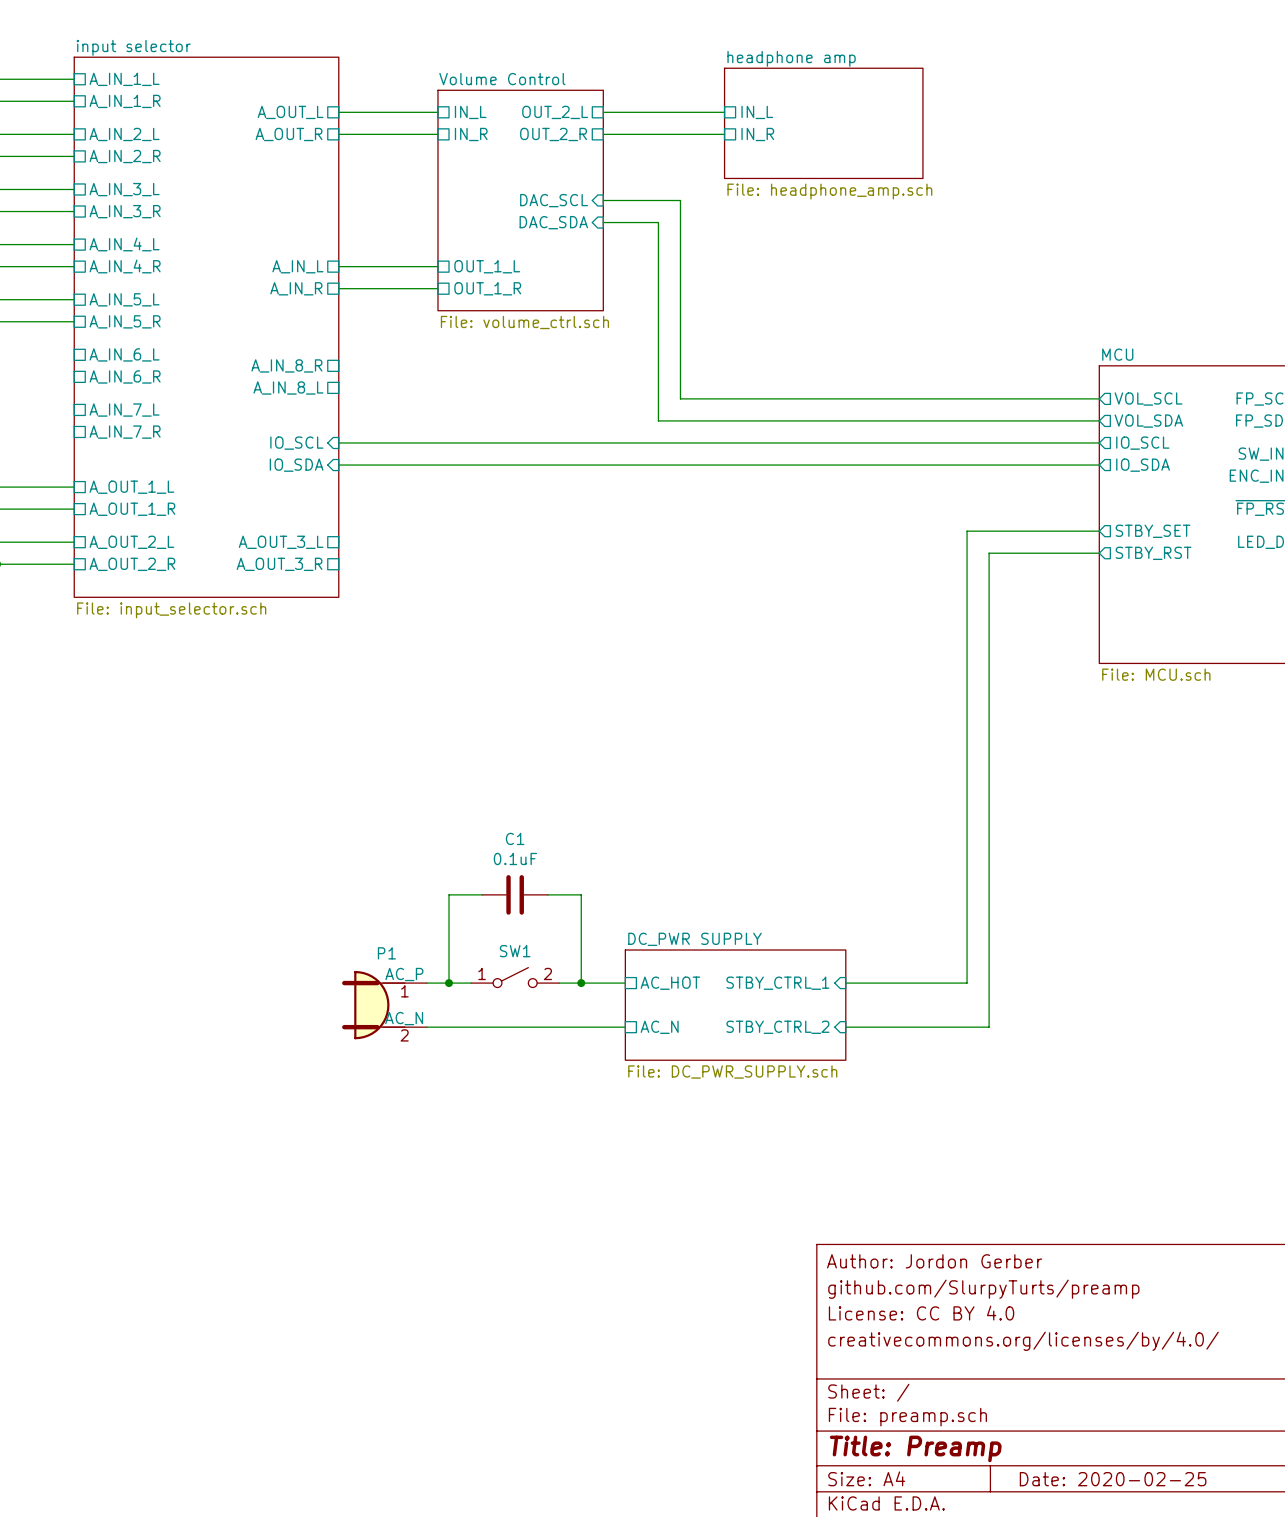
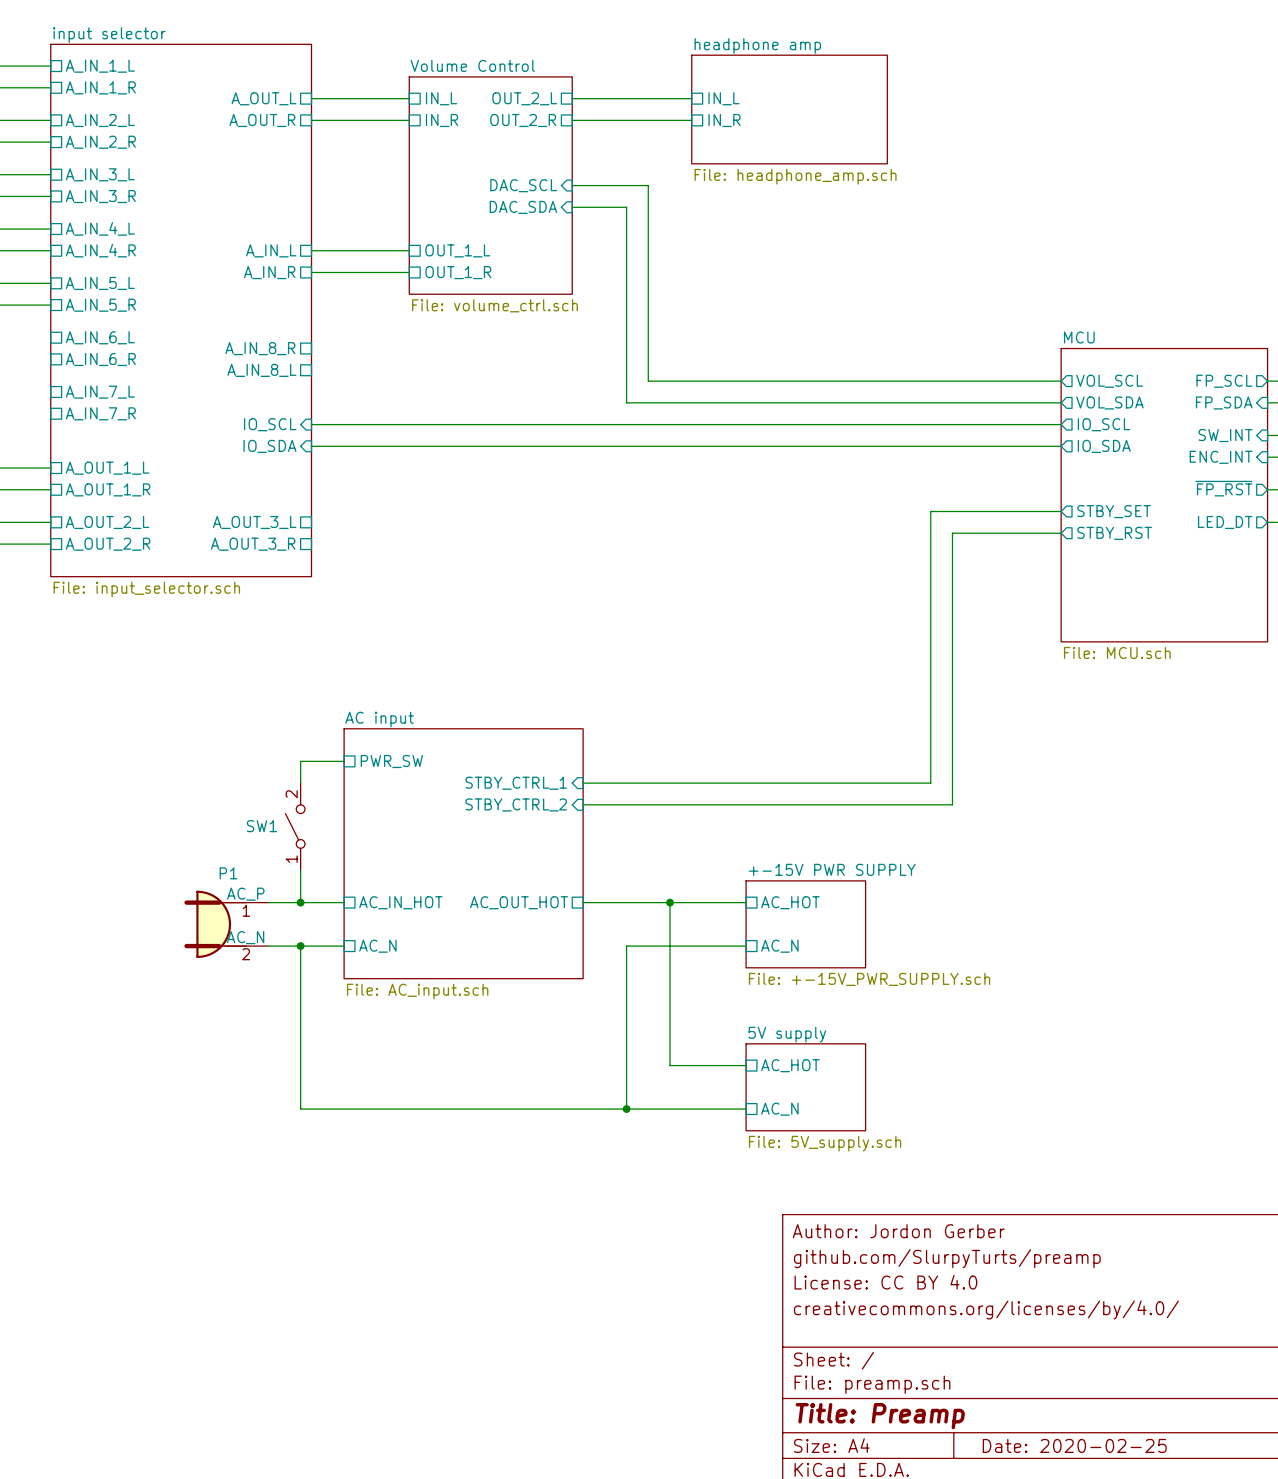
wire: none -> (344, 761) (300, 761) (300, 783)
sheet pin: none -> PWR_SW (391, 761)
sheet pin: none -> STBY_CTRL_1 (516, 783)
wire: (967, 806) (967, 983) (845, 983) -> (930, 783) (583, 783)
sheet pin: none -> STBY_CTRL_2 (516, 804)
wire: (989, 828) (989, 1027) (845, 1027) -> (952, 804) (583, 804)
sheet AC input: none -> File: AC_input.sch (463, 853)
wire: none -> (300, 870) (300, 902)
wire: (482, 894) (449, 894) (449, 983) -> none
C1: 0.1uF (515, 894) -> none
wire: (548, 894) (581, 894) (581, 983) -> none
wire: none -> (268, 902) (344, 902)
junction: none -> (300, 902)
wire: none -> (583, 902) (746, 902)
wire: none -> (670, 902) (670, 1065) (746, 1065)
junction: none -> (670, 902)
sheet pin: none -> AC_IN_HOT (400, 902)
sheet pin: none -> AC_OUT_HOT (519, 902)
sheet pin: none -> AC_HOT (790, 902)
sheet +-15V PWR SUPPLY: none -> File: +-15V_PWR_SUPPLY.sch (805, 924)
wire: none -> (268, 946) (344, 946)
wire: none -> (300, 946) (300, 1109) (746, 1109)
junction: none -> (300, 946)
sheet pin: none -> AC_N (377, 946)
wire: none -> (746, 946) (626, 946) (626, 1109)
sheet pin: none -> AC_N (779, 946)
SW1 rotation: 0° (515, 977) -> 90° counterclockwise (295, 826)
SW1 position: (515, 977) -> (295, 826)
wire: (426, 983) (471, 983) -> none
junction: (449, 983) -> none
wire: (559, 983) (625, 983) -> none
junction: (581, 983) -> none
sheet pin: AC_HOT (670, 983) -> none
sheet pin: STBY_CTRL_1 (777, 983) -> none
P1 position: (384, 1005) -> (226, 924)
sheet DC_PWR SUPPLY: File: DC_PWR_SUPPLY.sch (735, 1005) -> none
wire: (426, 1027) (625, 1027) -> none
sheet pin: AC_N (659, 1027) -> none
sheet pin: STBY_CTRL_2 (777, 1027) -> none
sheet pin: none -> AC_HOT (790, 1065)
sheet 5V supply: none -> File: 5V_supply.sch (805, 1087)
junction: none -> (626, 1109)
sheet pin: none -> AC_N (779, 1109)

